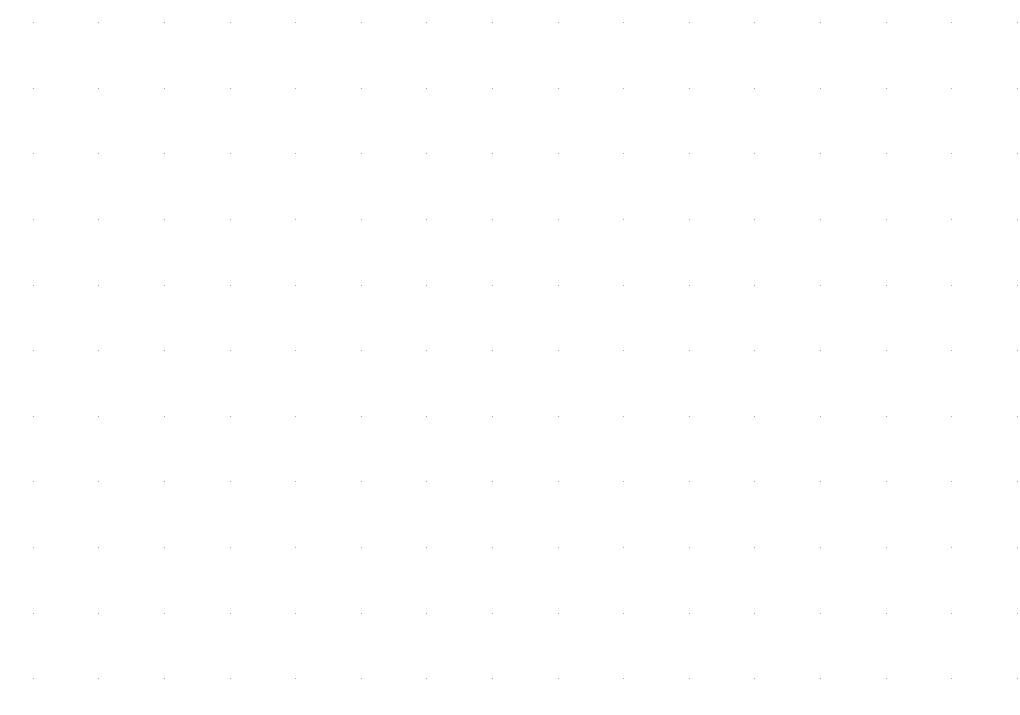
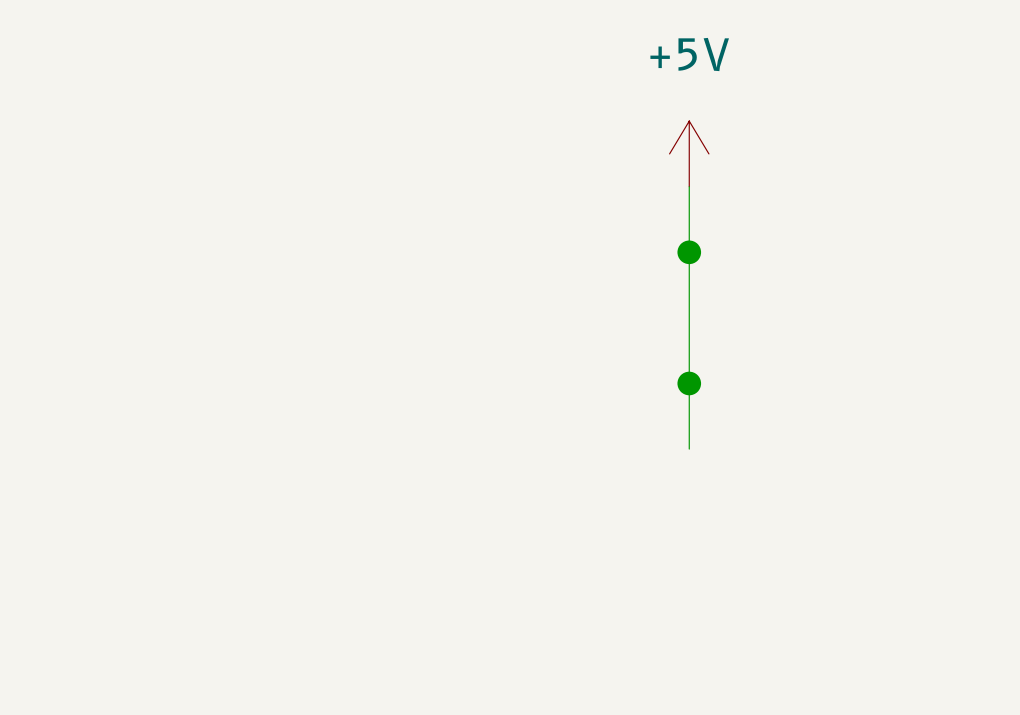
power symbol: none -> +5V (689, 153)
wire: none -> (689, 186) (689, 449)
junction: none -> (689, 252)
junction: none -> (689, 383)

